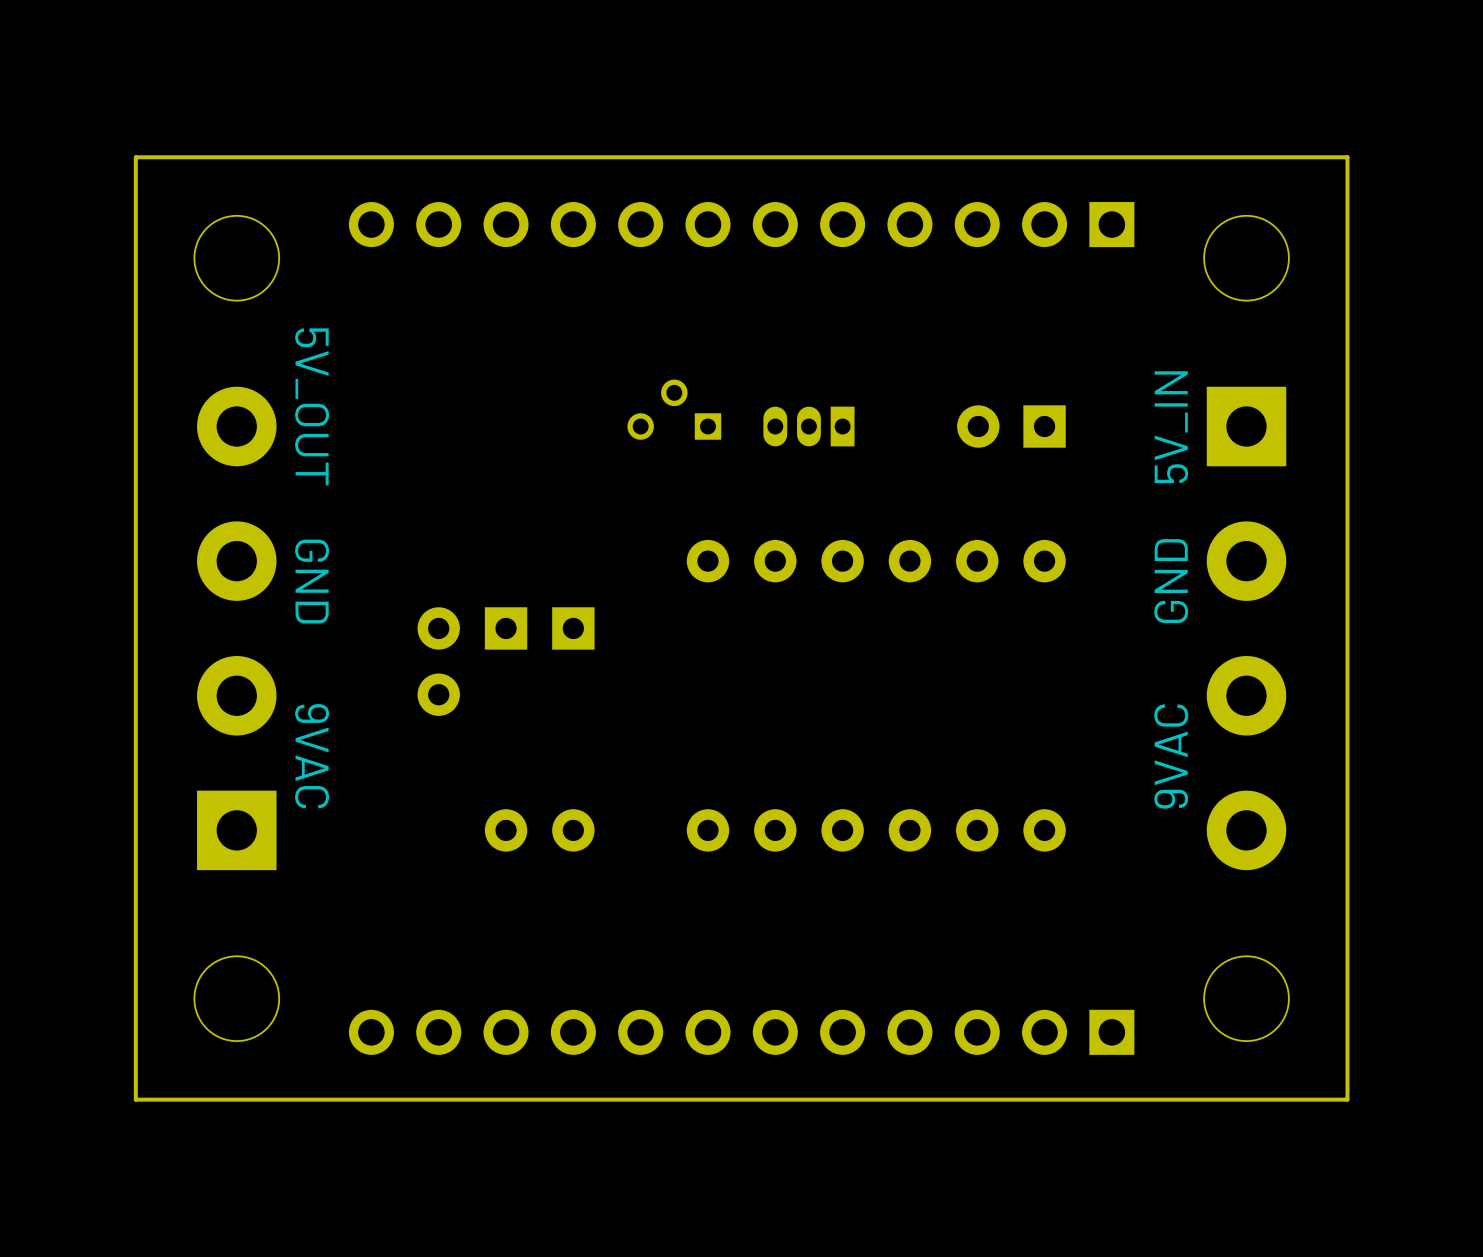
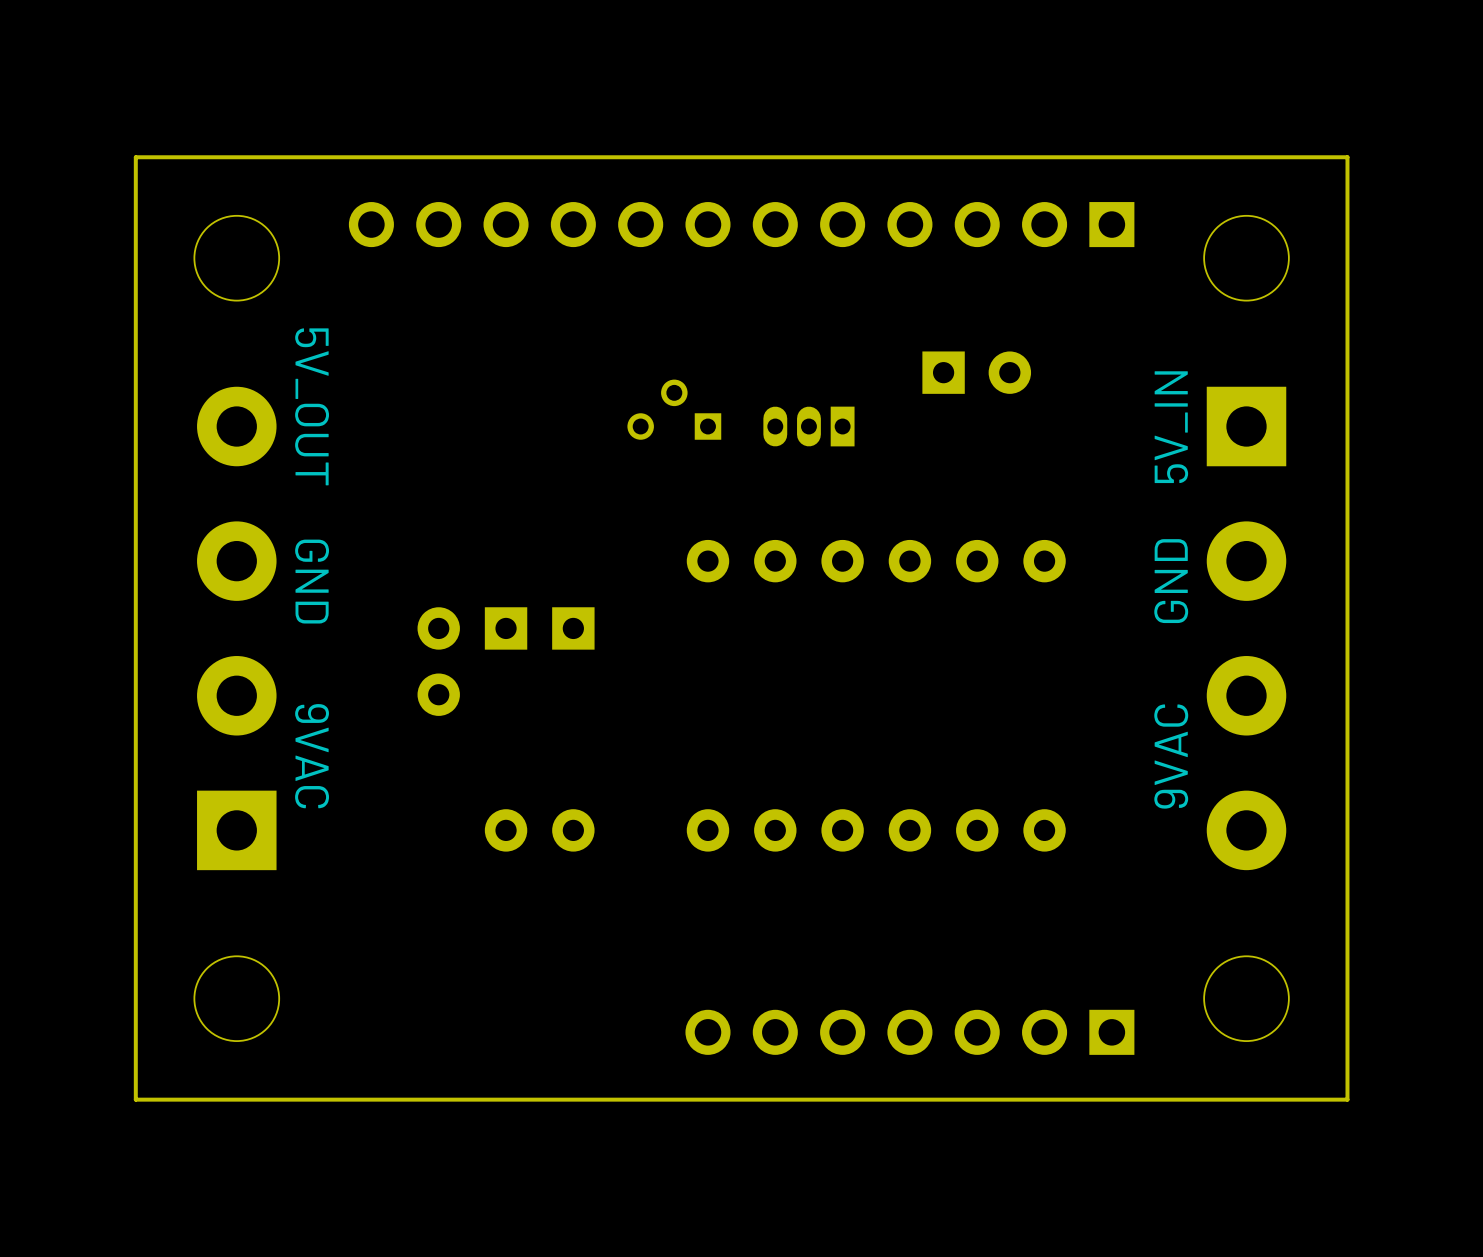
part rotation: 0° (1011, 426) -> 180° (976, 372)
part: (741, 1032) -> none

